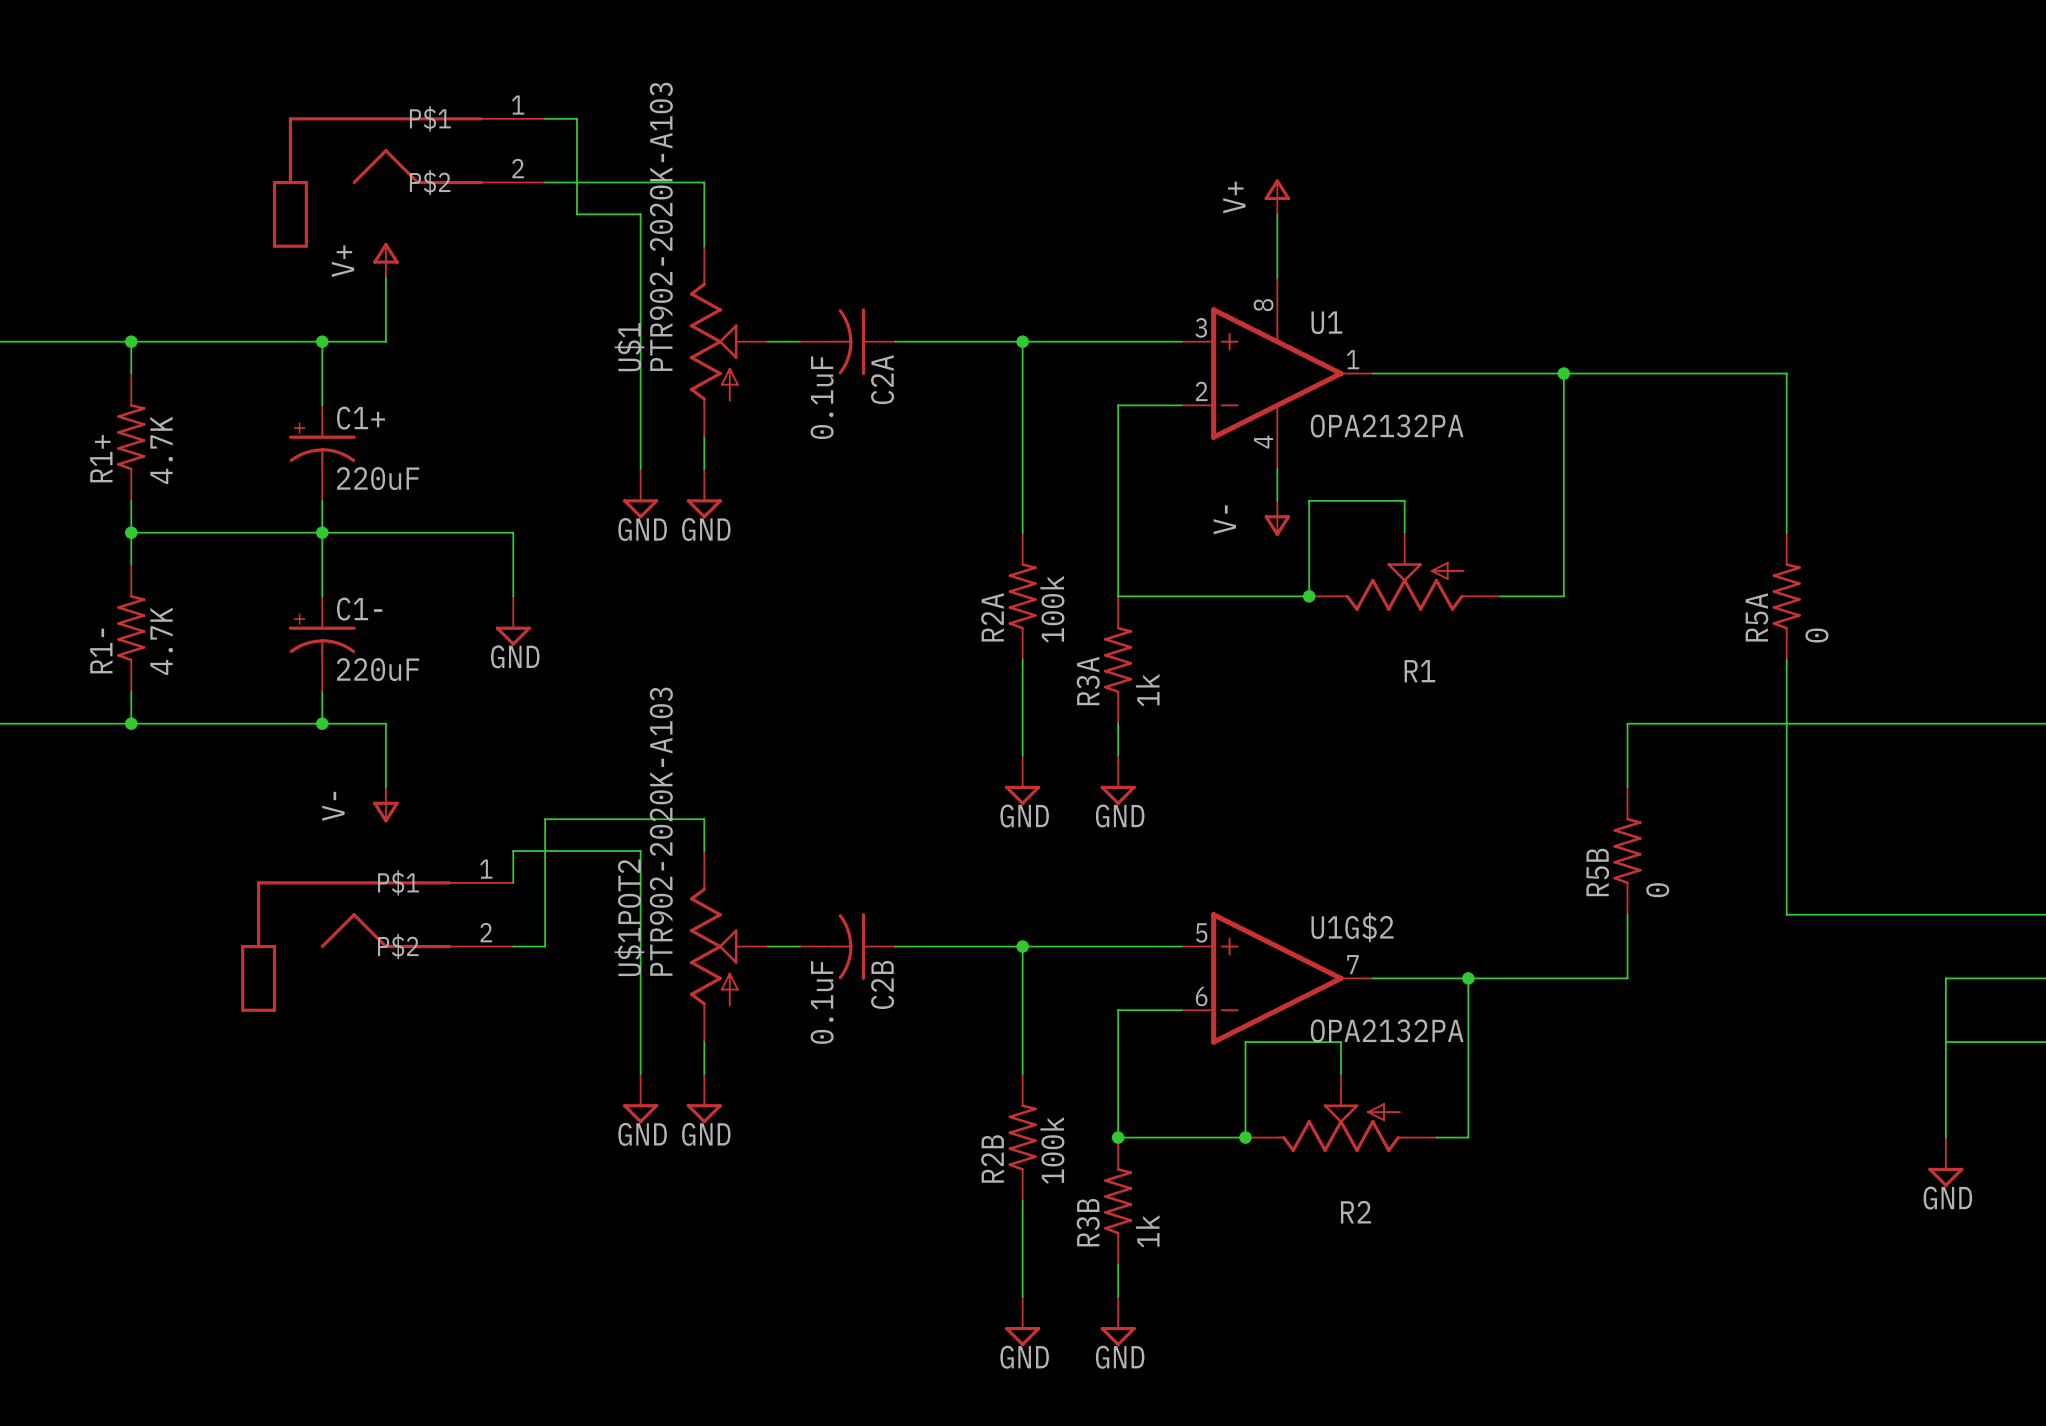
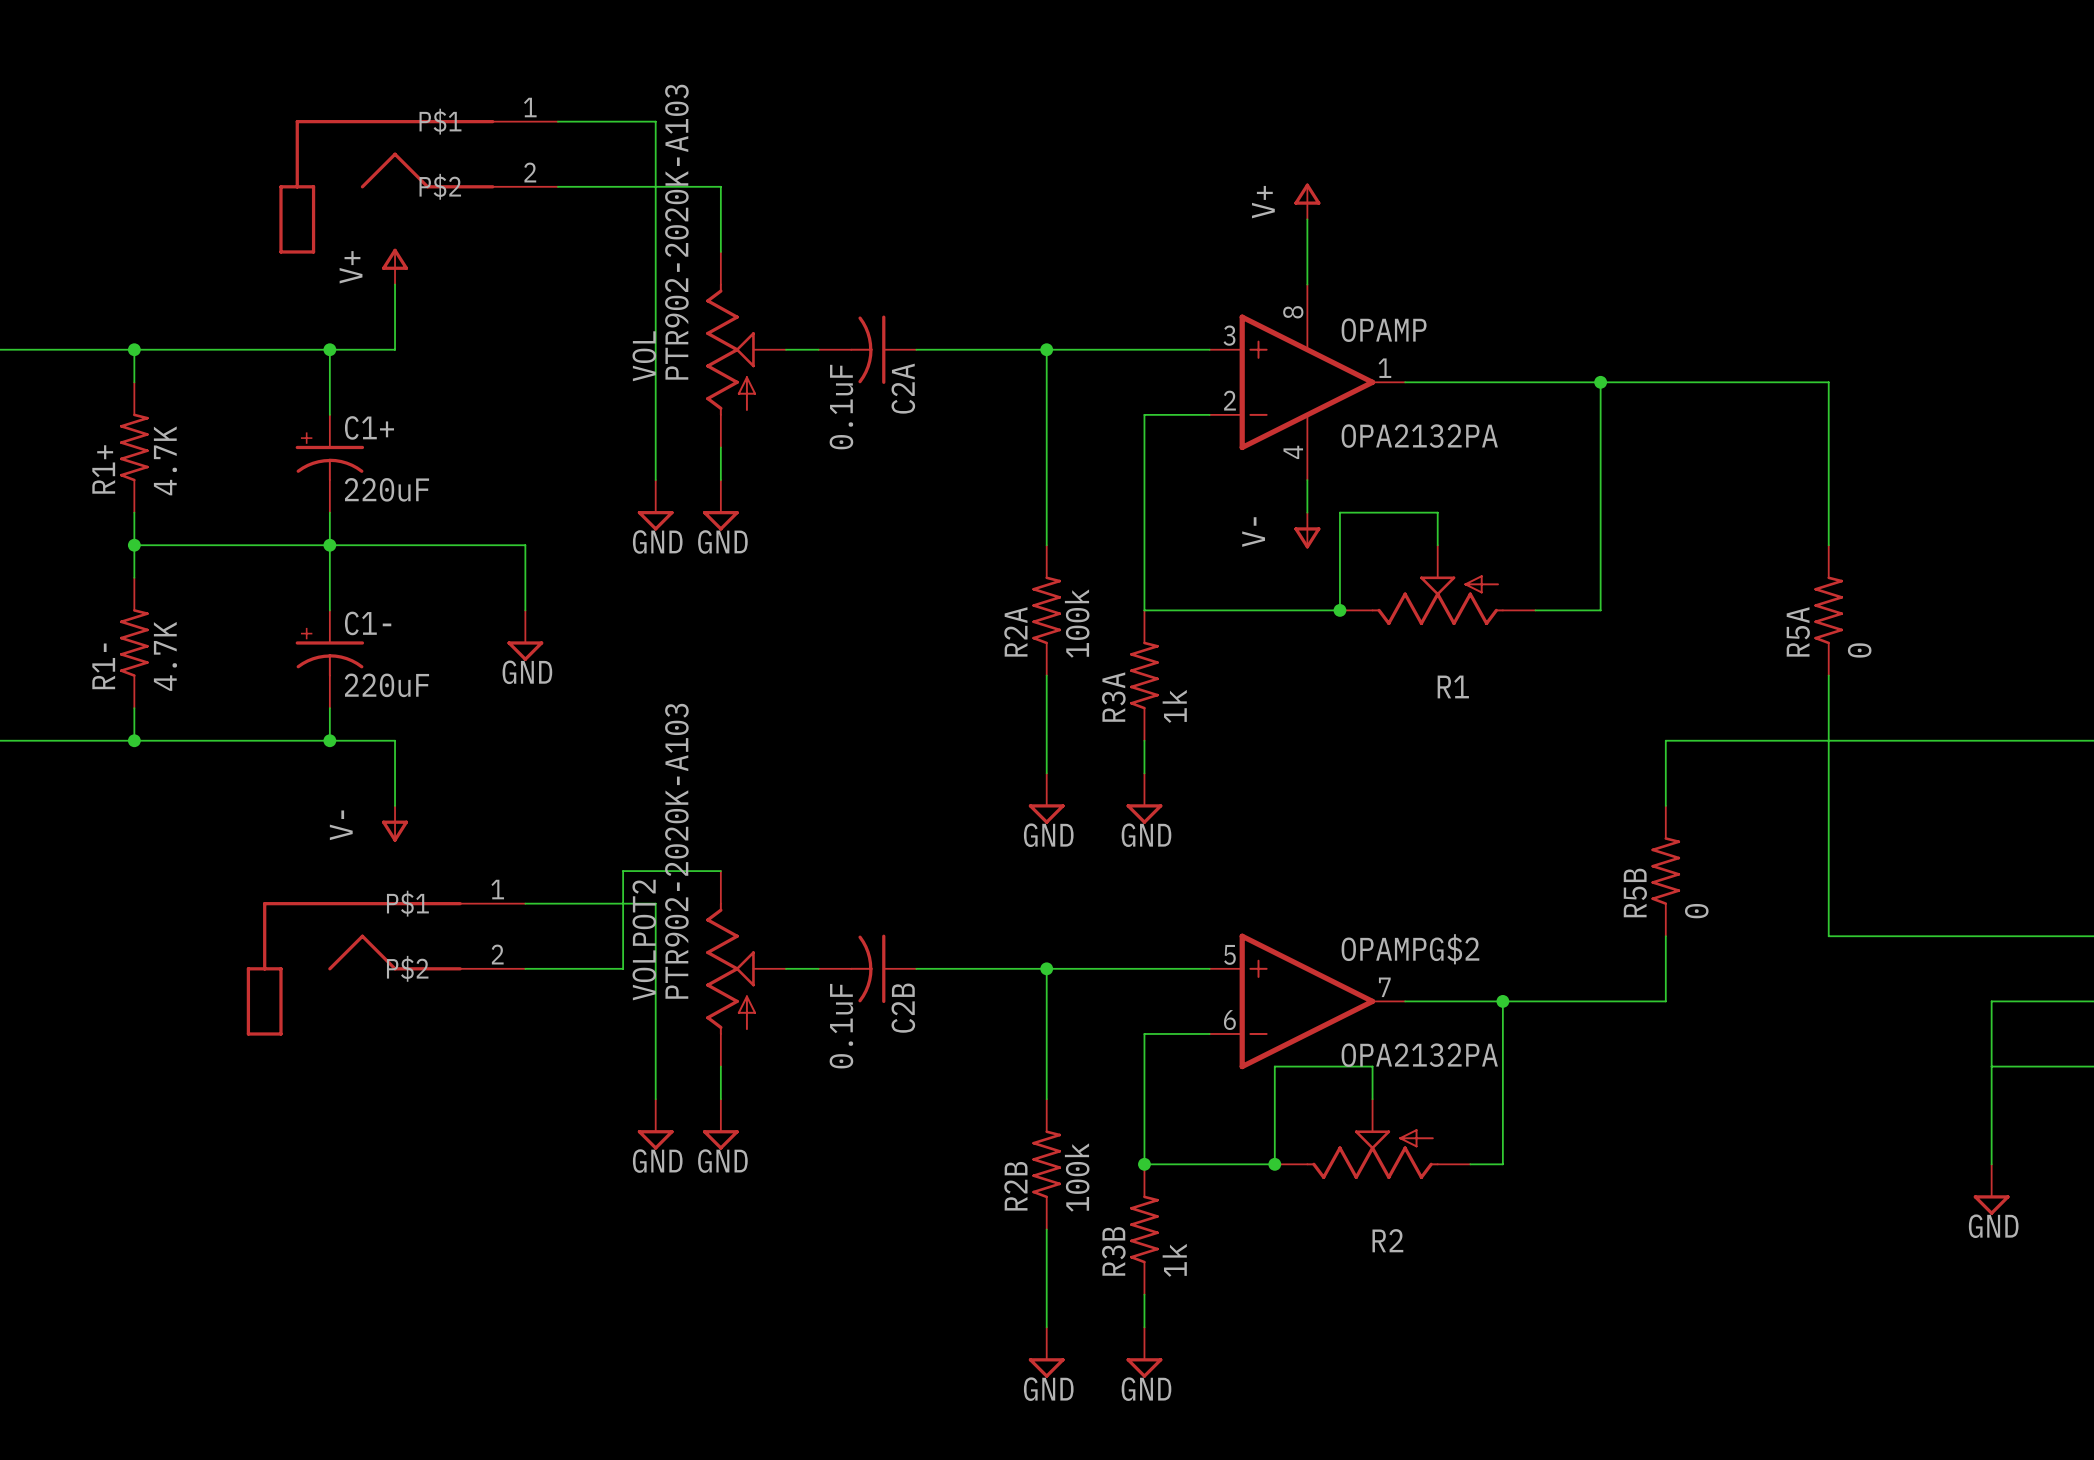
wire: (576, 118) (576, 214) (640, 214) -> (590, 121) (655, 121) (655, 219)
U1 name: U1 (1326, 322) -> OPAMP (1384, 330)
U$1 name: U$1 (629, 347) -> VOL (644, 356)
wire: (608, 851) (513, 851) (513, 882) -> (655, 903) (525, 903)
wire: (640, 851) (640, 882) -> (655, 871) (720, 871)
wire: (704, 851) (704, 819) (545, 819) (545, 946) -> (623, 871) (623, 968) (557, 968)
U$1POT2 name: U$1POT2 (629, 917) -> VOLPOT2 (644, 940)
U1G$2 name: U1G$2 (1352, 927) -> OPAMPG$2 (1410, 949)

